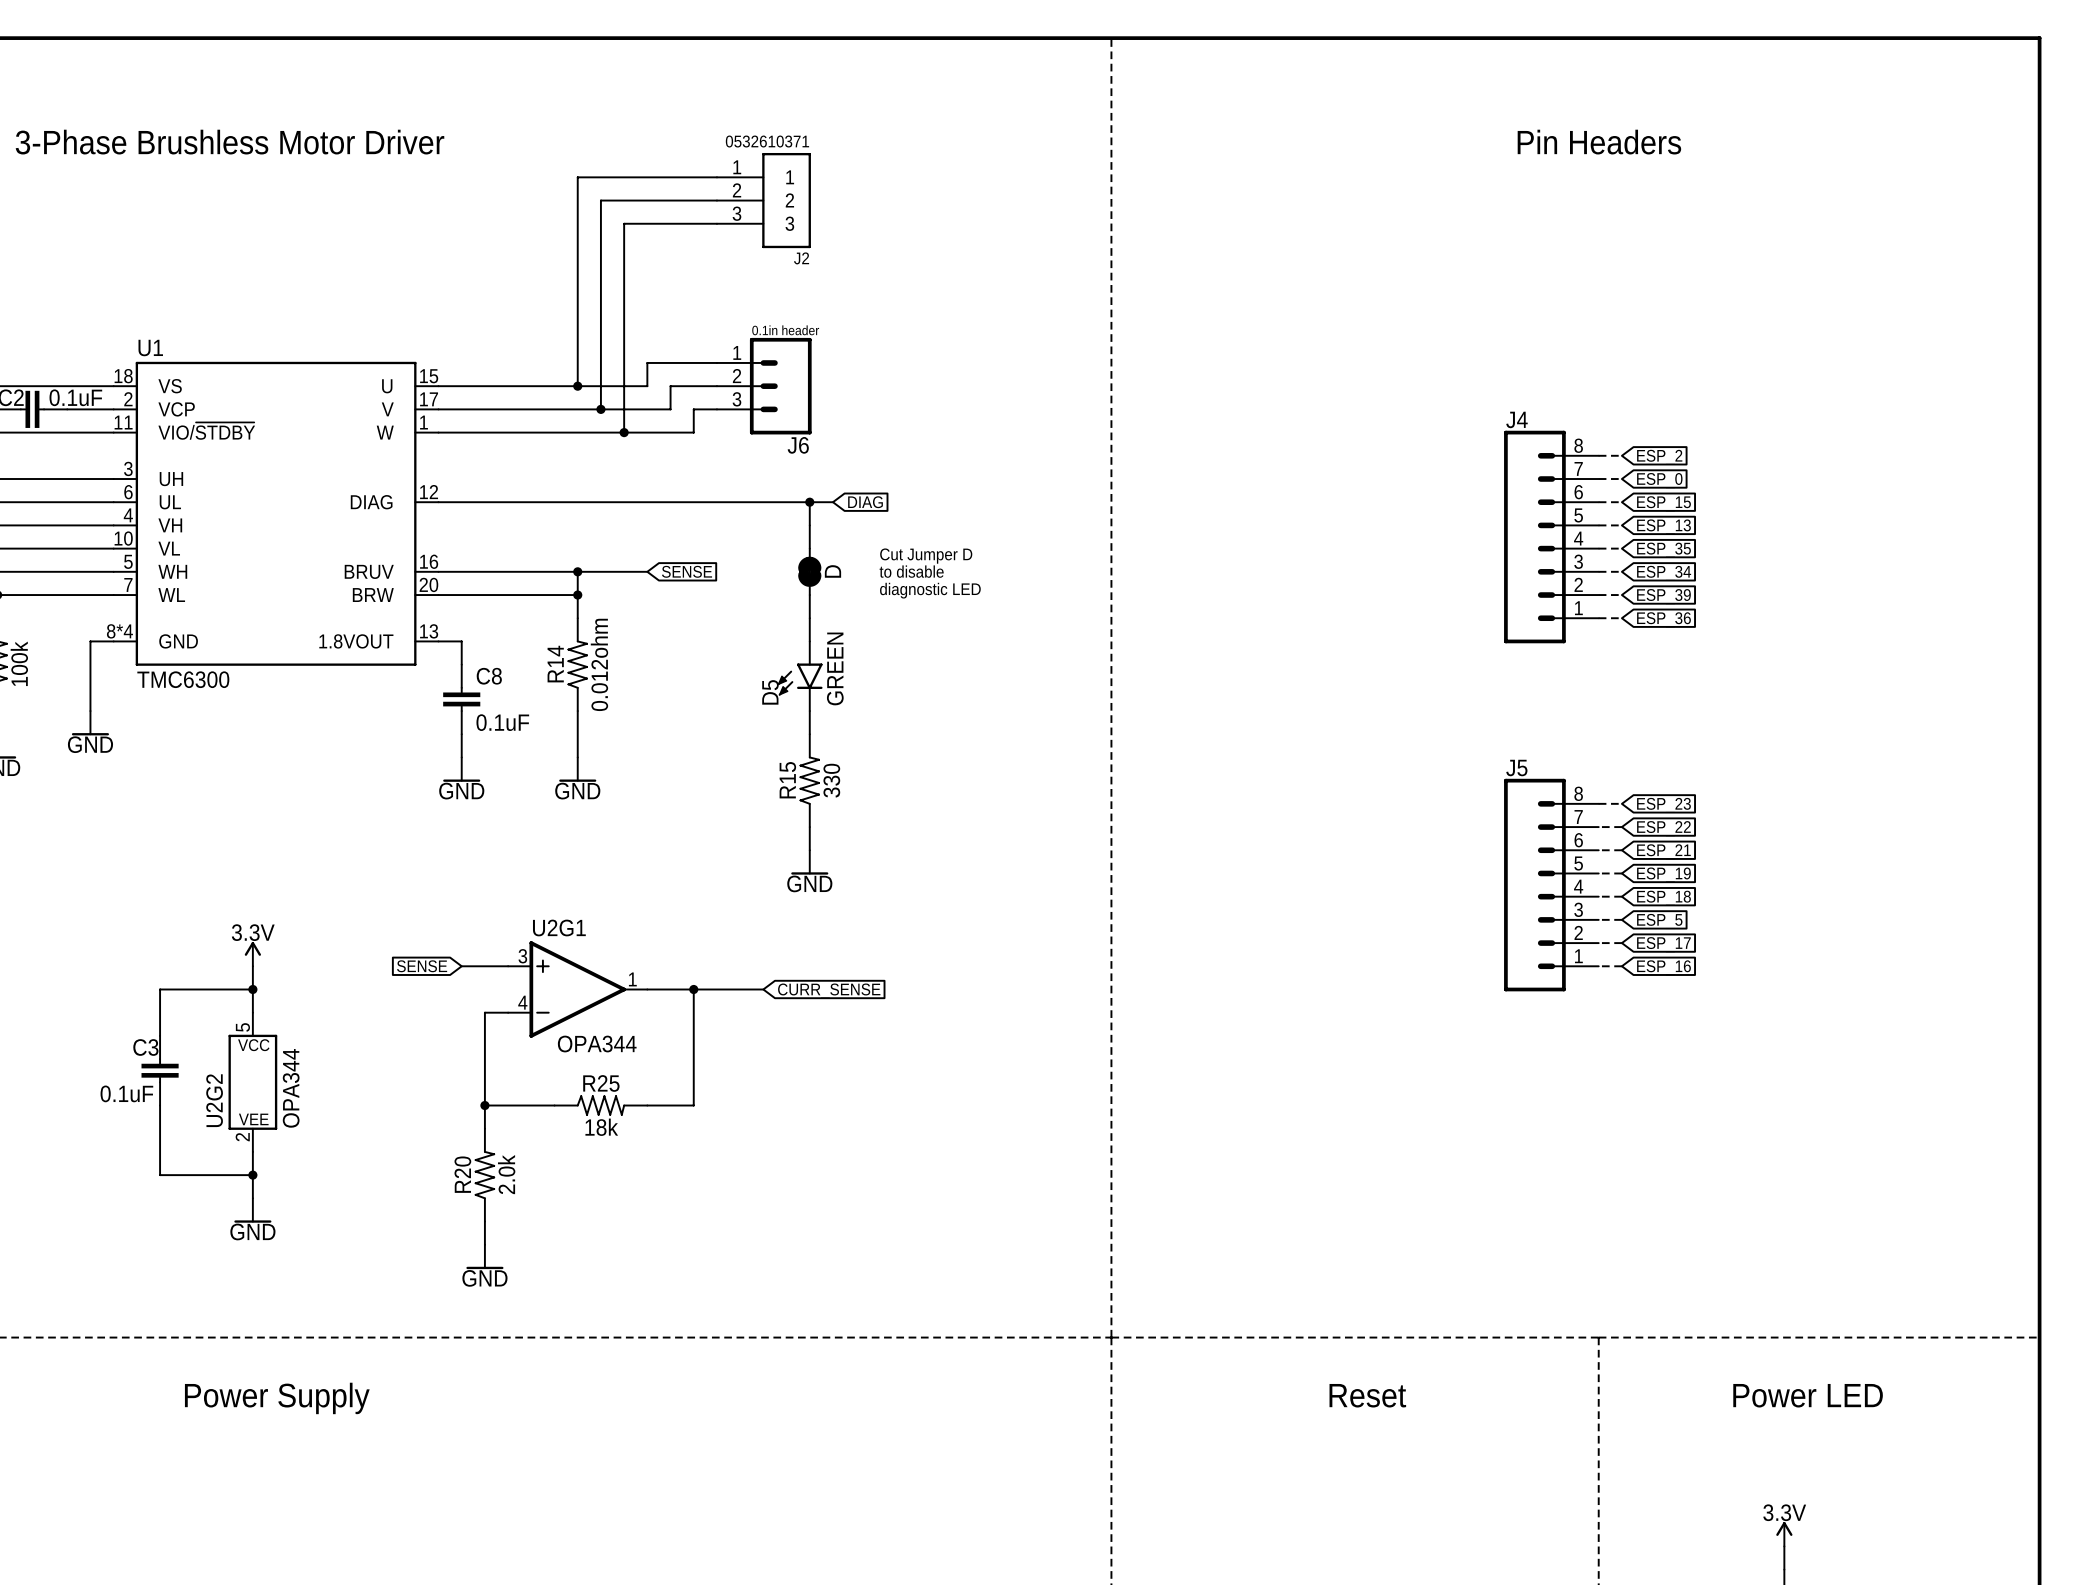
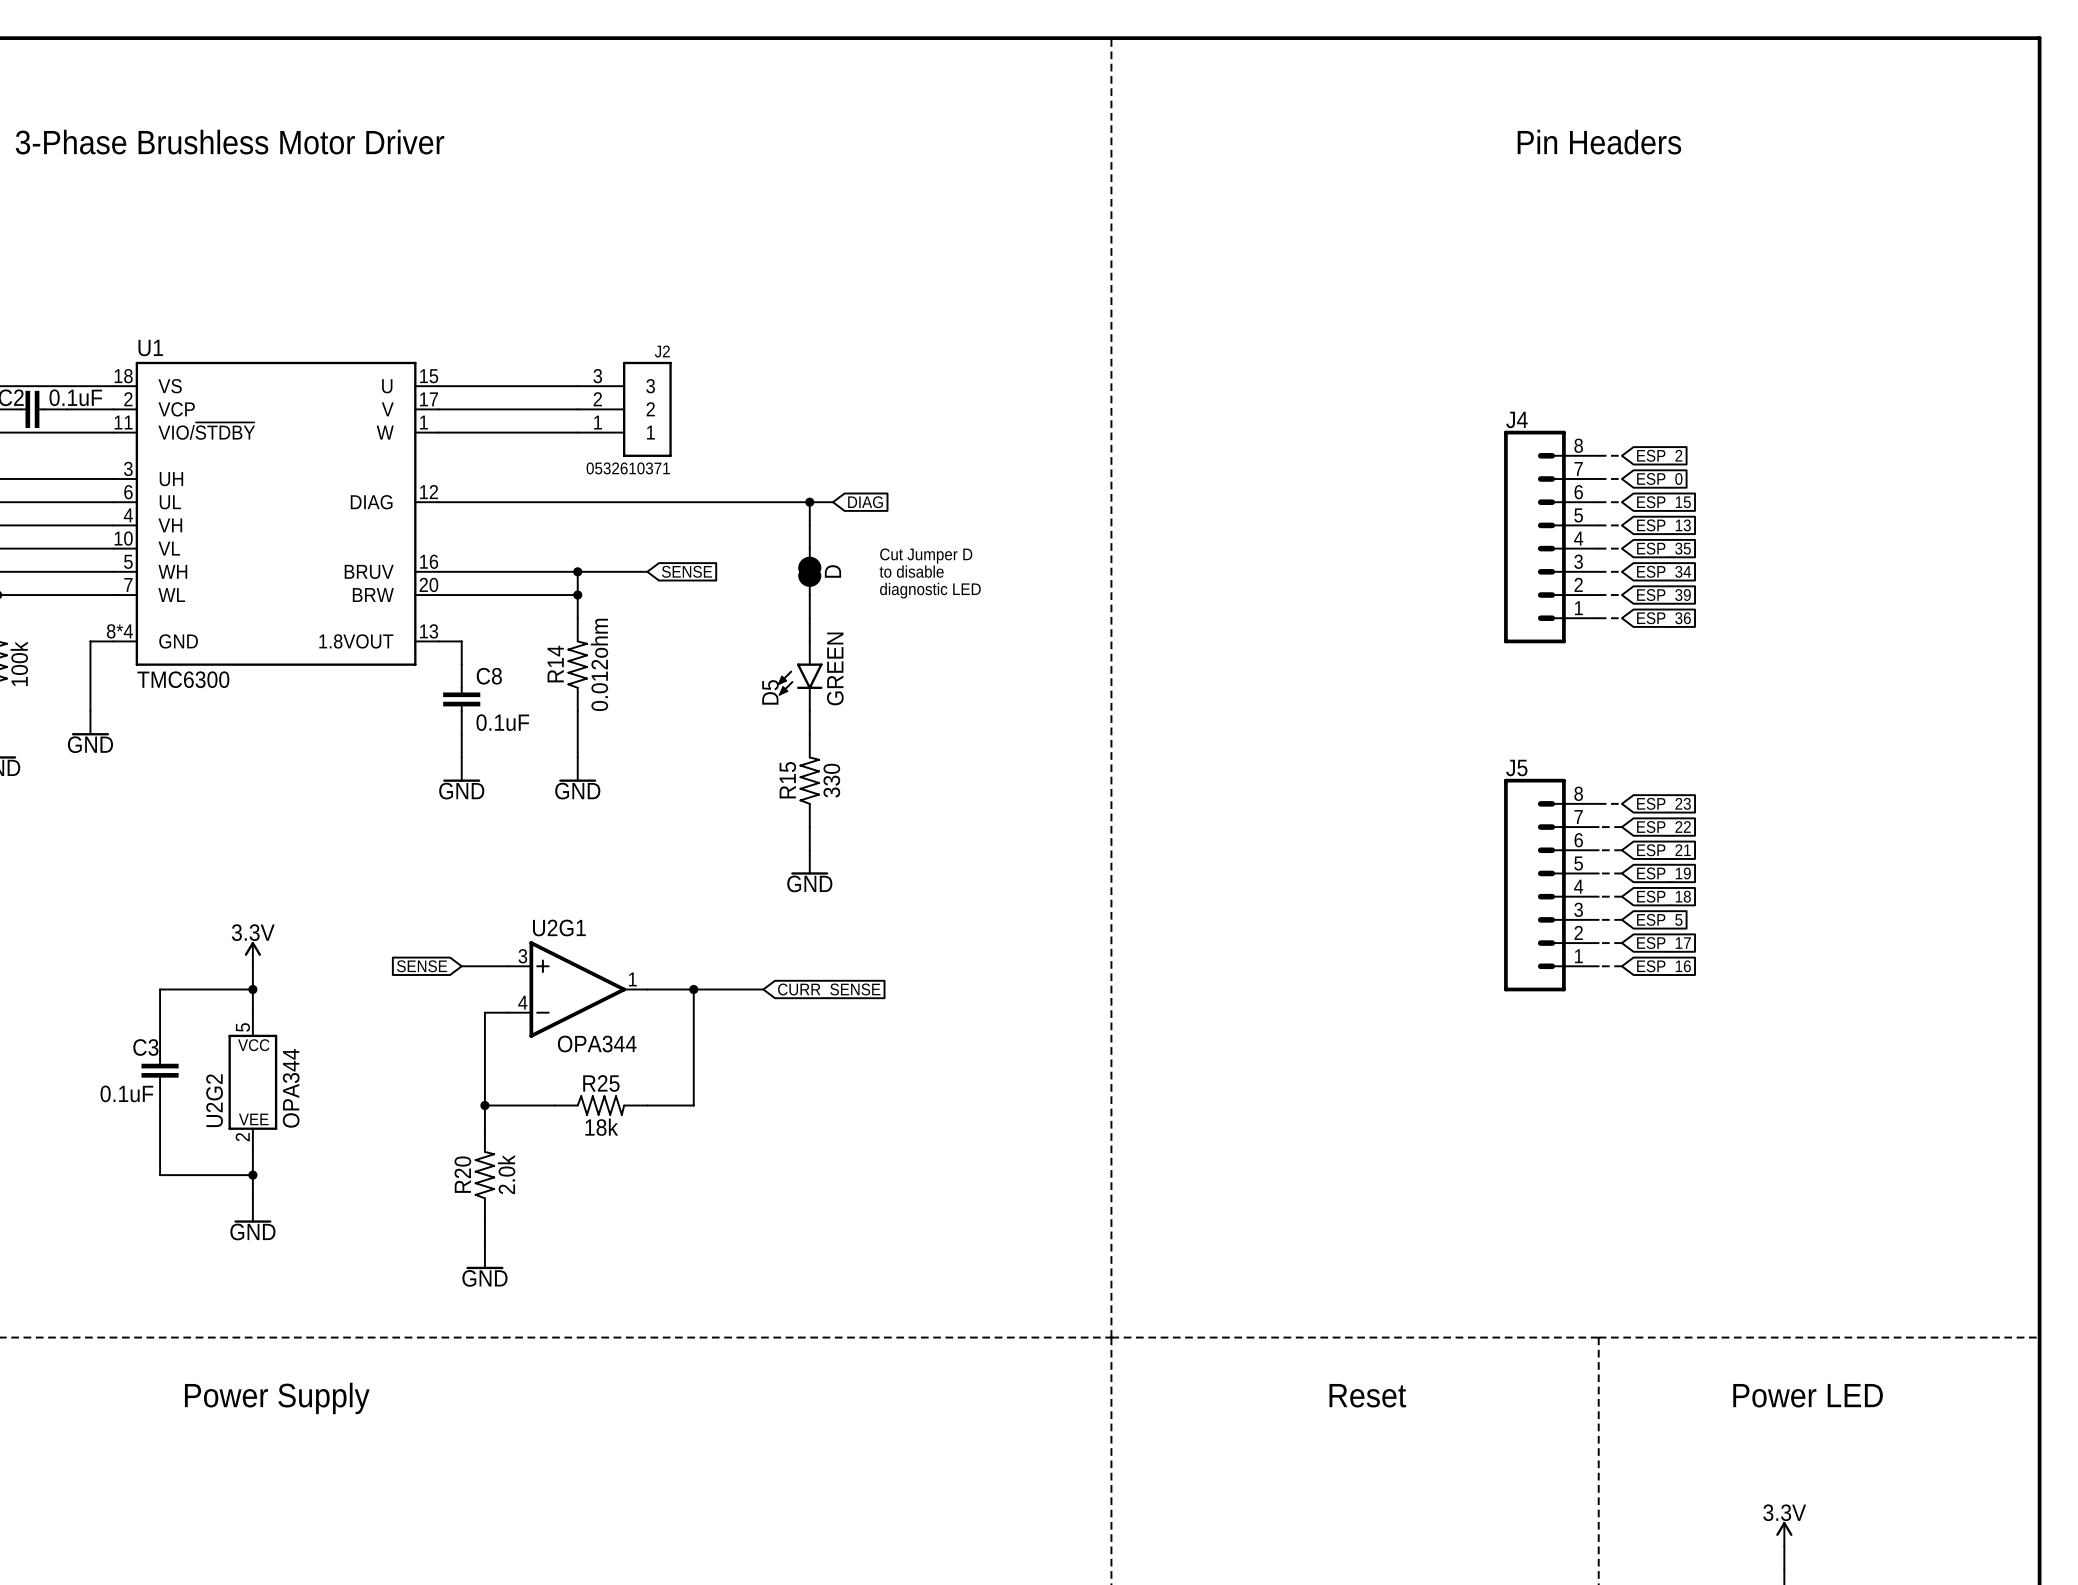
wire: (716, 177) (577, 177) (577, 386) (647, 386) (647, 362) (716, 362) -> none
wire: (716, 200) (600, 200) (600, 409) -> none
J2 position: (763, 200) -> (624, 409)
J2 flip: as is (786, 200) -> up-down (647, 409)
wire: (716, 223) (624, 223) (624, 432) -> none
junction: (577, 386) -> none
wire: (716, 386) (670, 386) (670, 409) (577, 409) -> none
J6: 0.1in header (764, 386) -> none
junction: (600, 409) -> none
wire: (716, 409) (693, 409) (693, 432) (577, 432) -> none
junction: (624, 432) -> none

